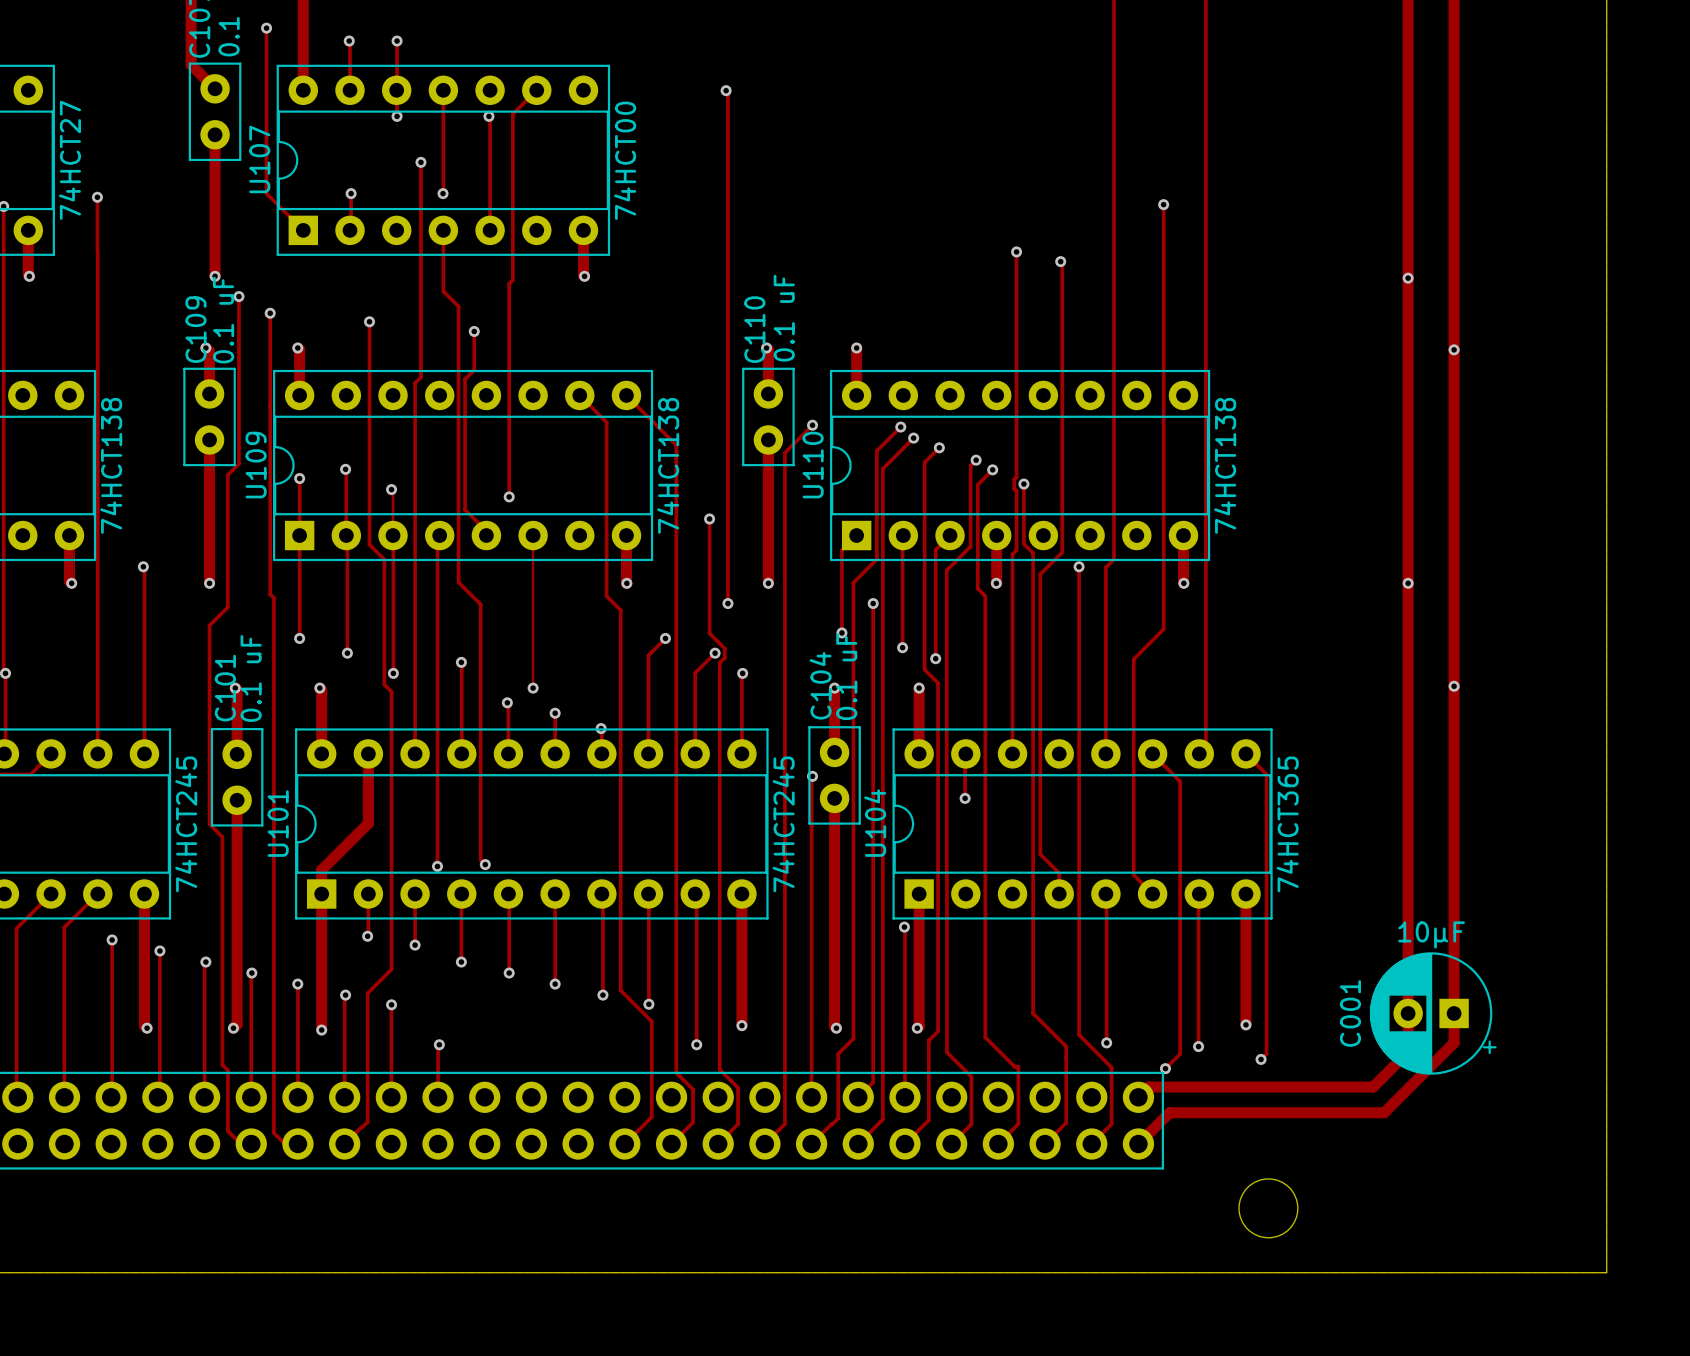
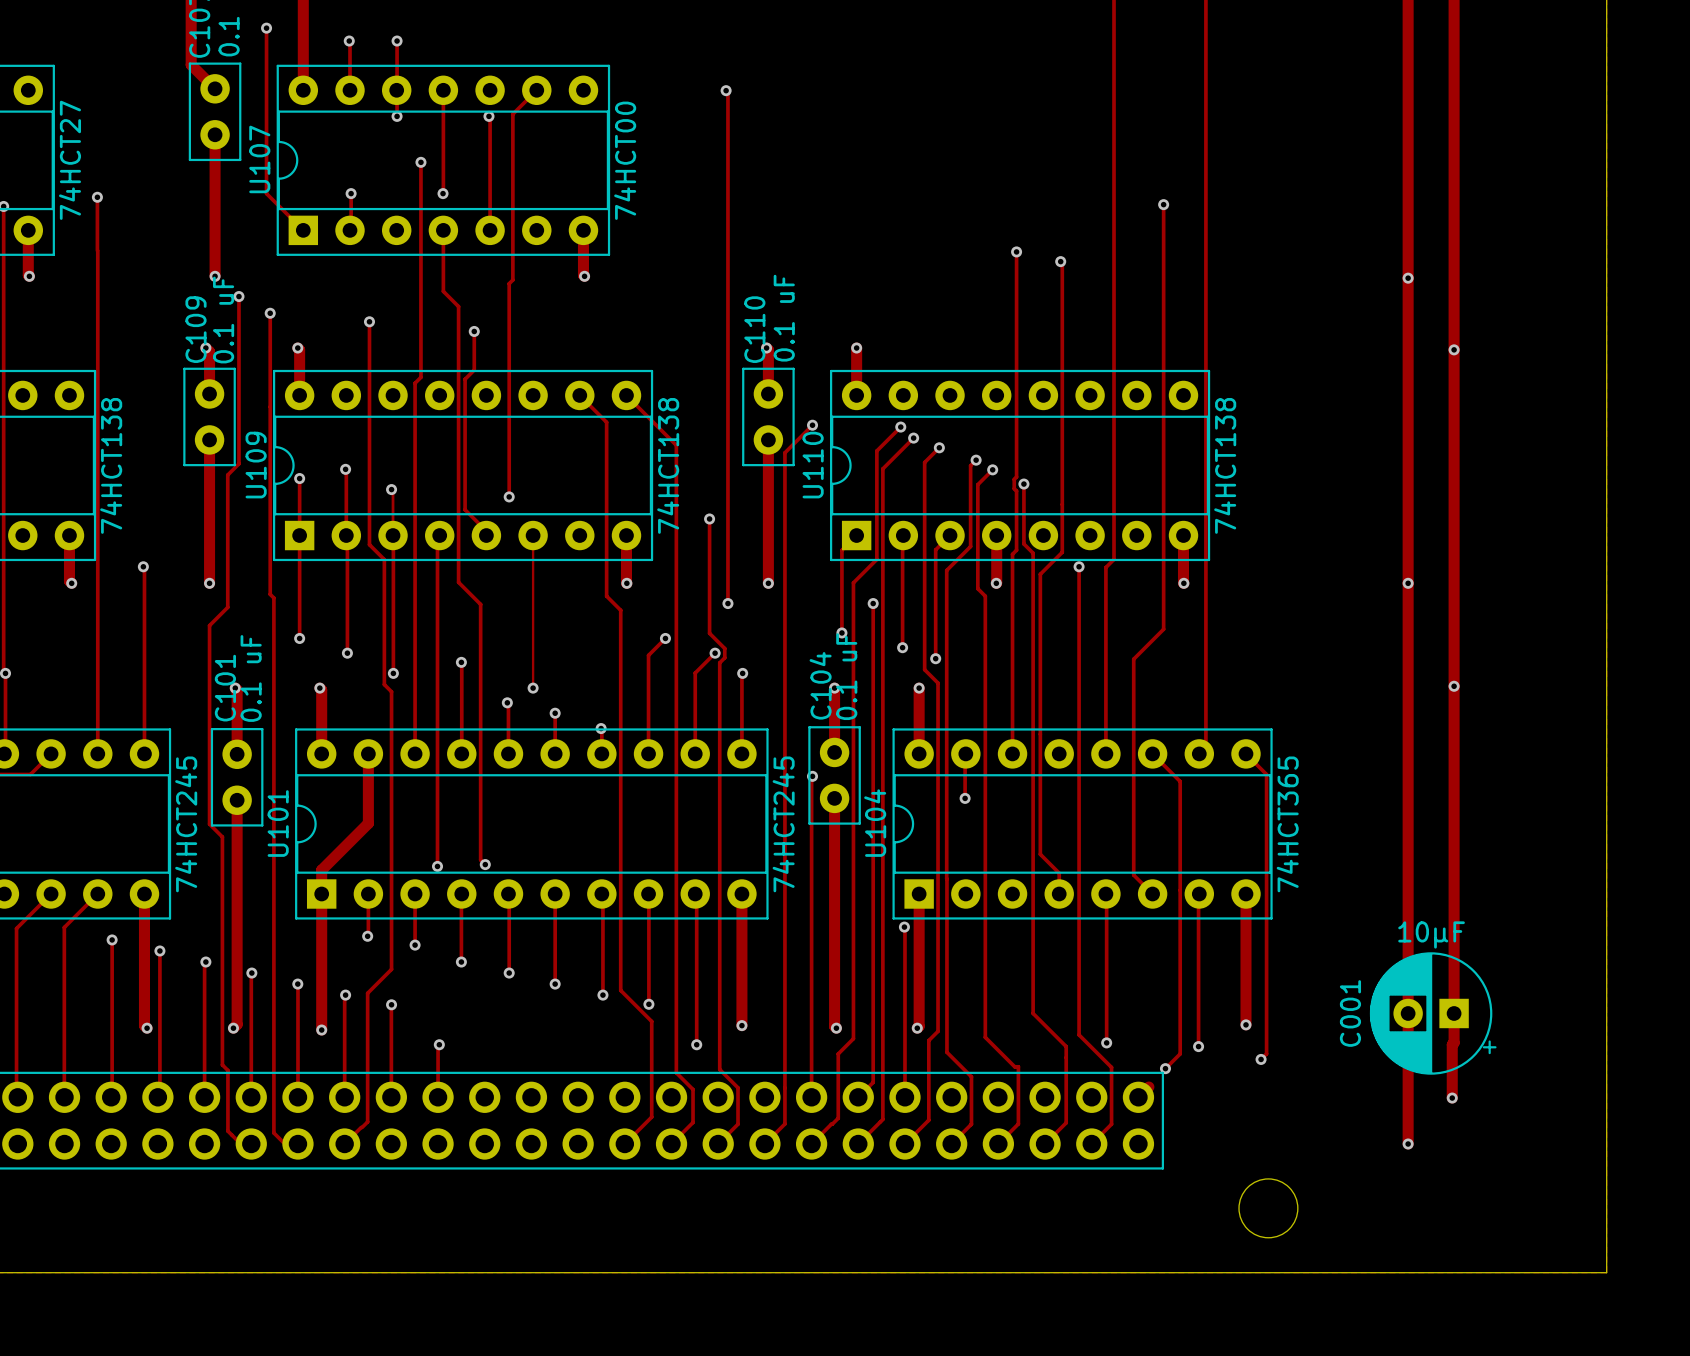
track: (1452, 1044) (1384, 1112) (1169, 1112) (1138, 1144) -> (1452, 1044) (1452, 1098)
track: (1408, 1052) (1373, 1087) (1148, 1087) -> (1408, 1052) (1408, 1144)
via: none -> (1452, 1098)
via: none -> (1408, 1144)

